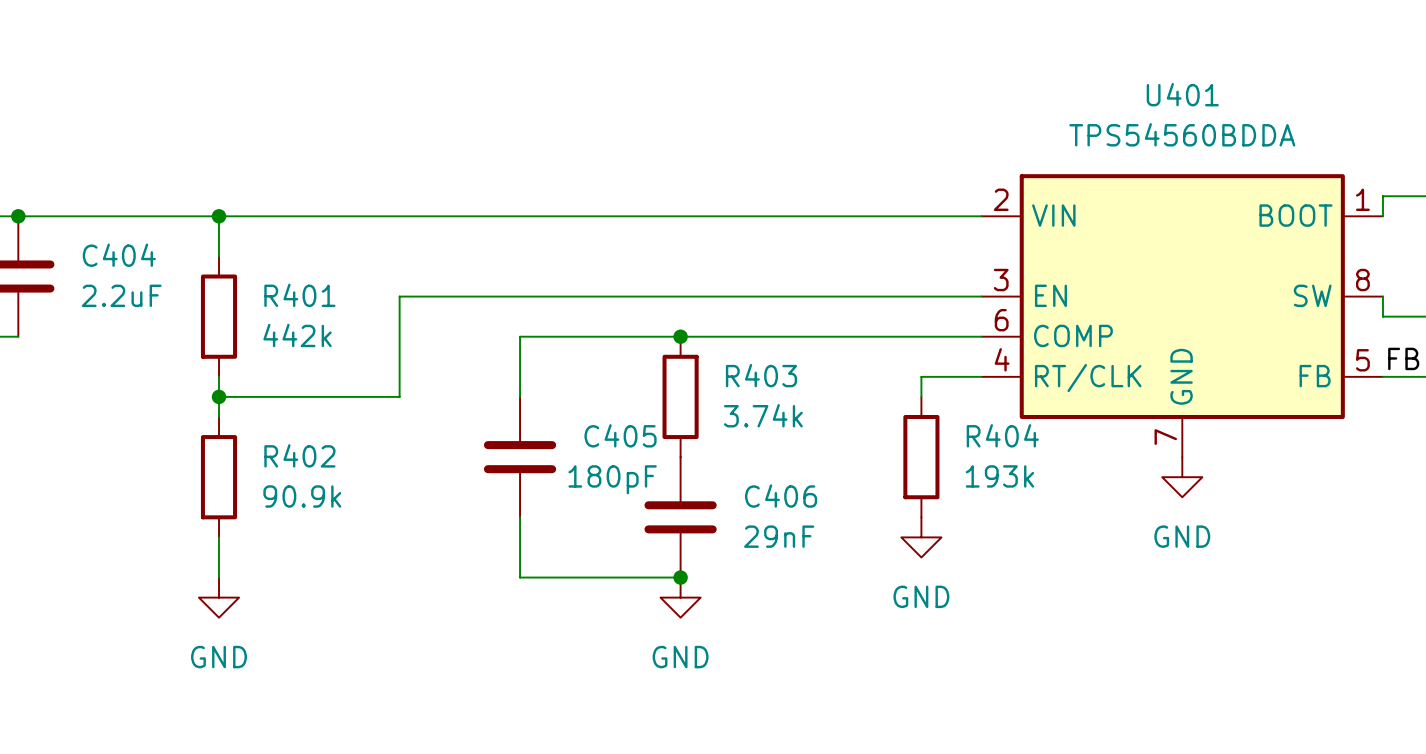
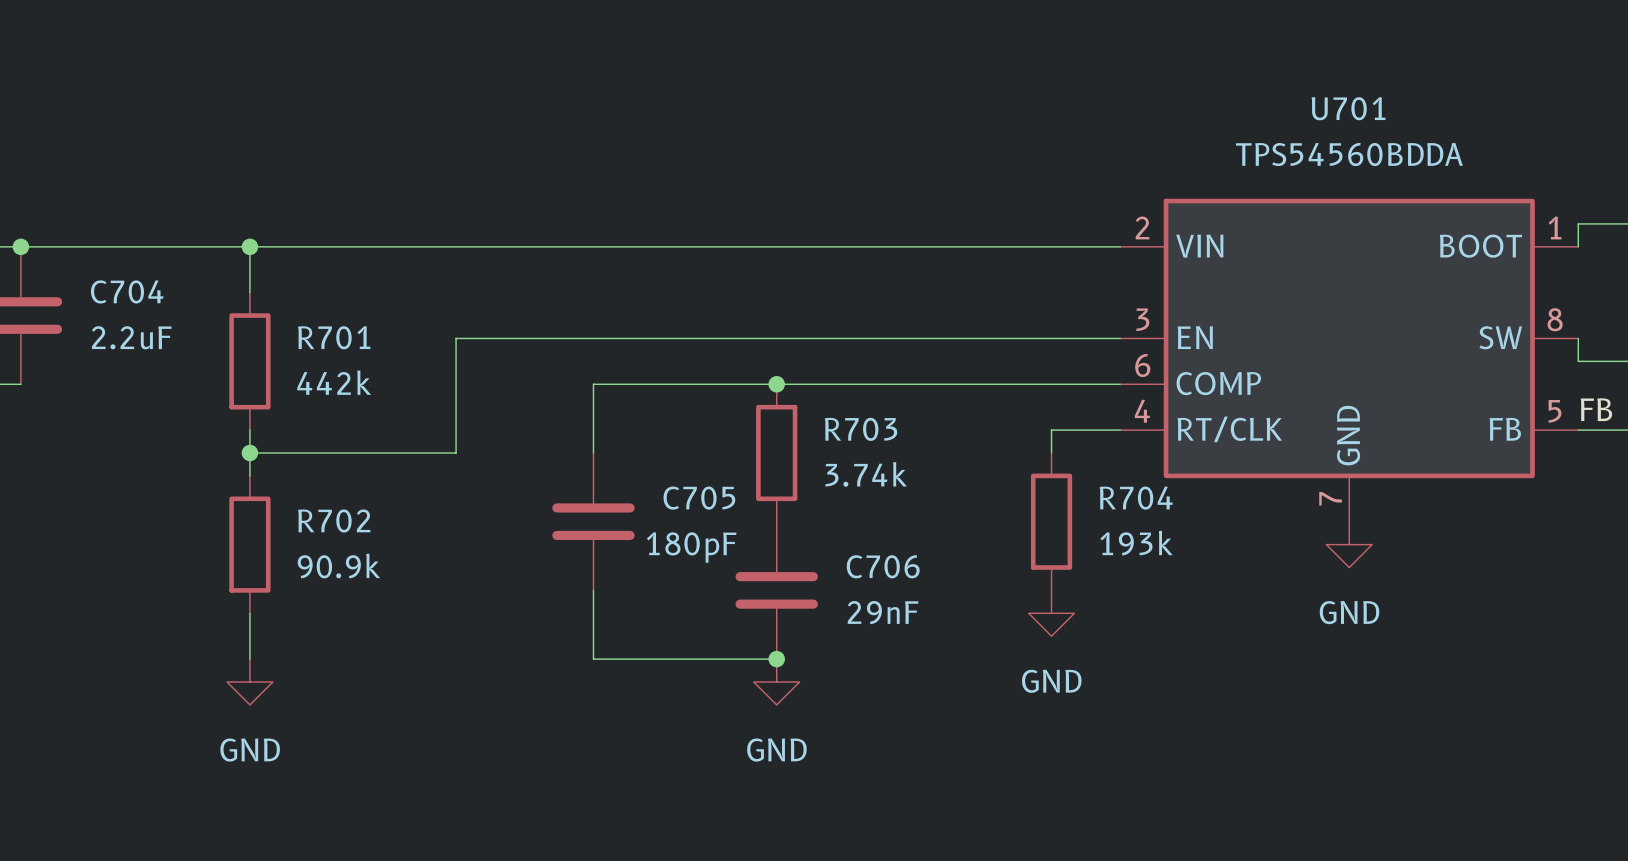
U401 name: U401 (1182, 94) -> U701 (1348, 108)
C404 name: C404 (119, 255) -> C704 (127, 291)
R401 name: R401 (299, 295) -> R701 (334, 337)
R403 name: R403 (761, 375) -> R703 (861, 429)
C405 name: C405 (620, 435) -> C705 (699, 498)
R404 name: R404 (1002, 435) -> R704 (1136, 498)
R402 name: R402 (299, 455) -> R702 (334, 520)
C406 name: C406 (781, 496) -> C706 (883, 566)

